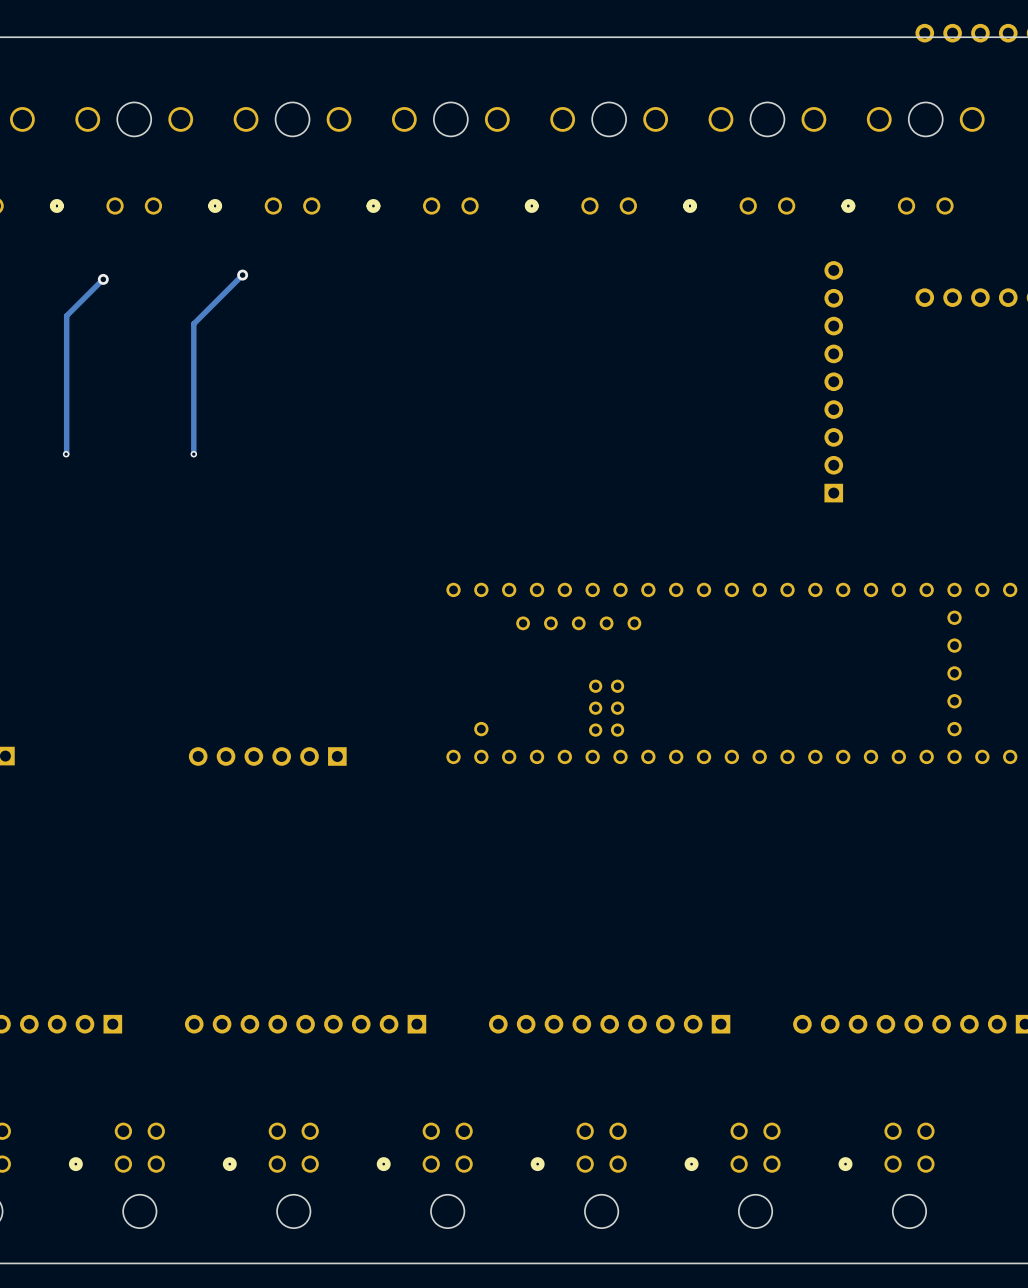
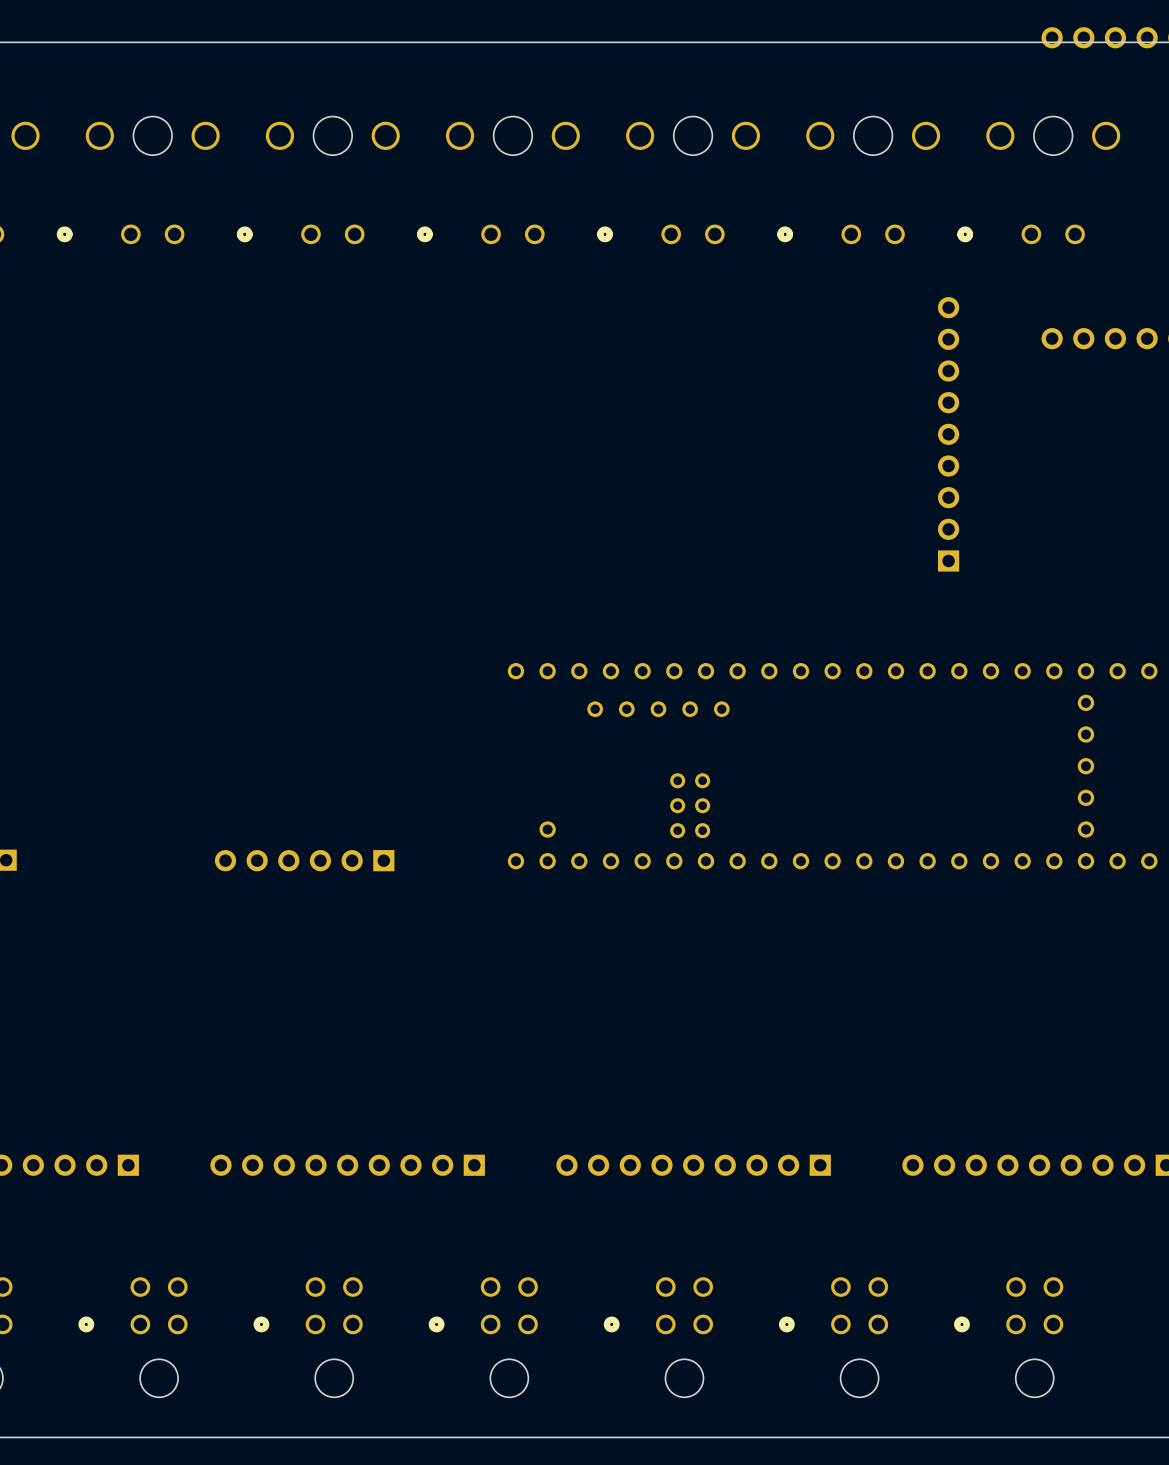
track: (242, 275) (193, 323) (193, 454) -> none
via: (242, 275) -> none
track: (103, 279) (66, 315) (66, 454) -> none
via: (103, 279) -> none
via: (66, 454) -> none
via: (193, 454) -> none

